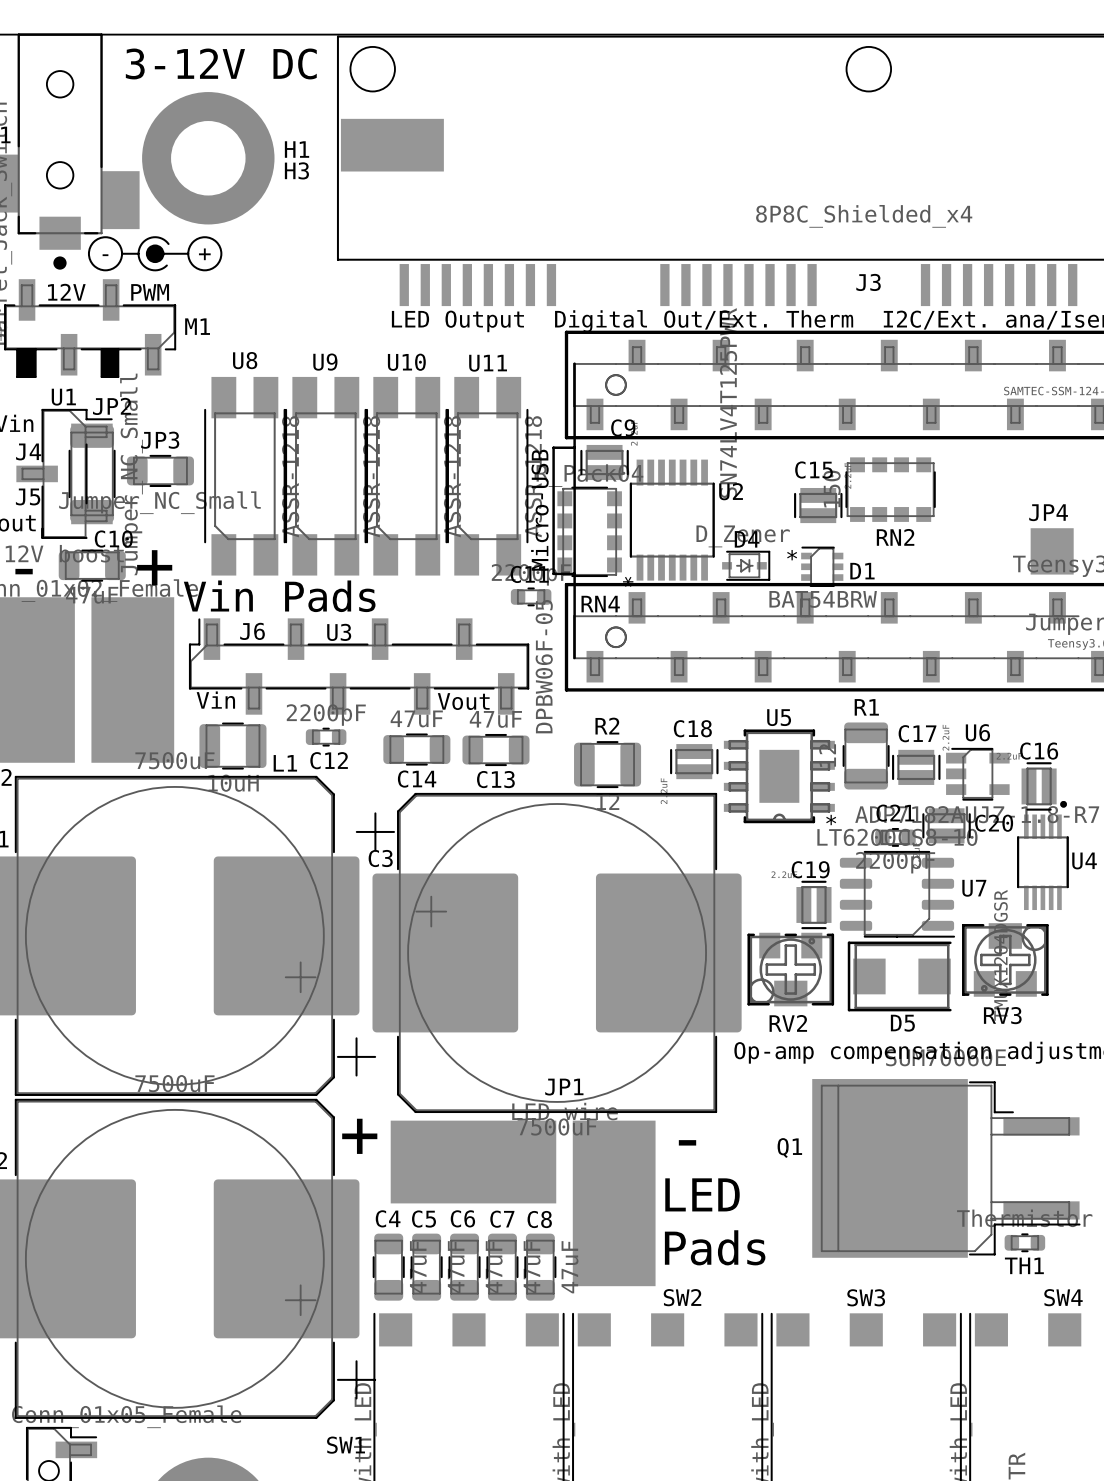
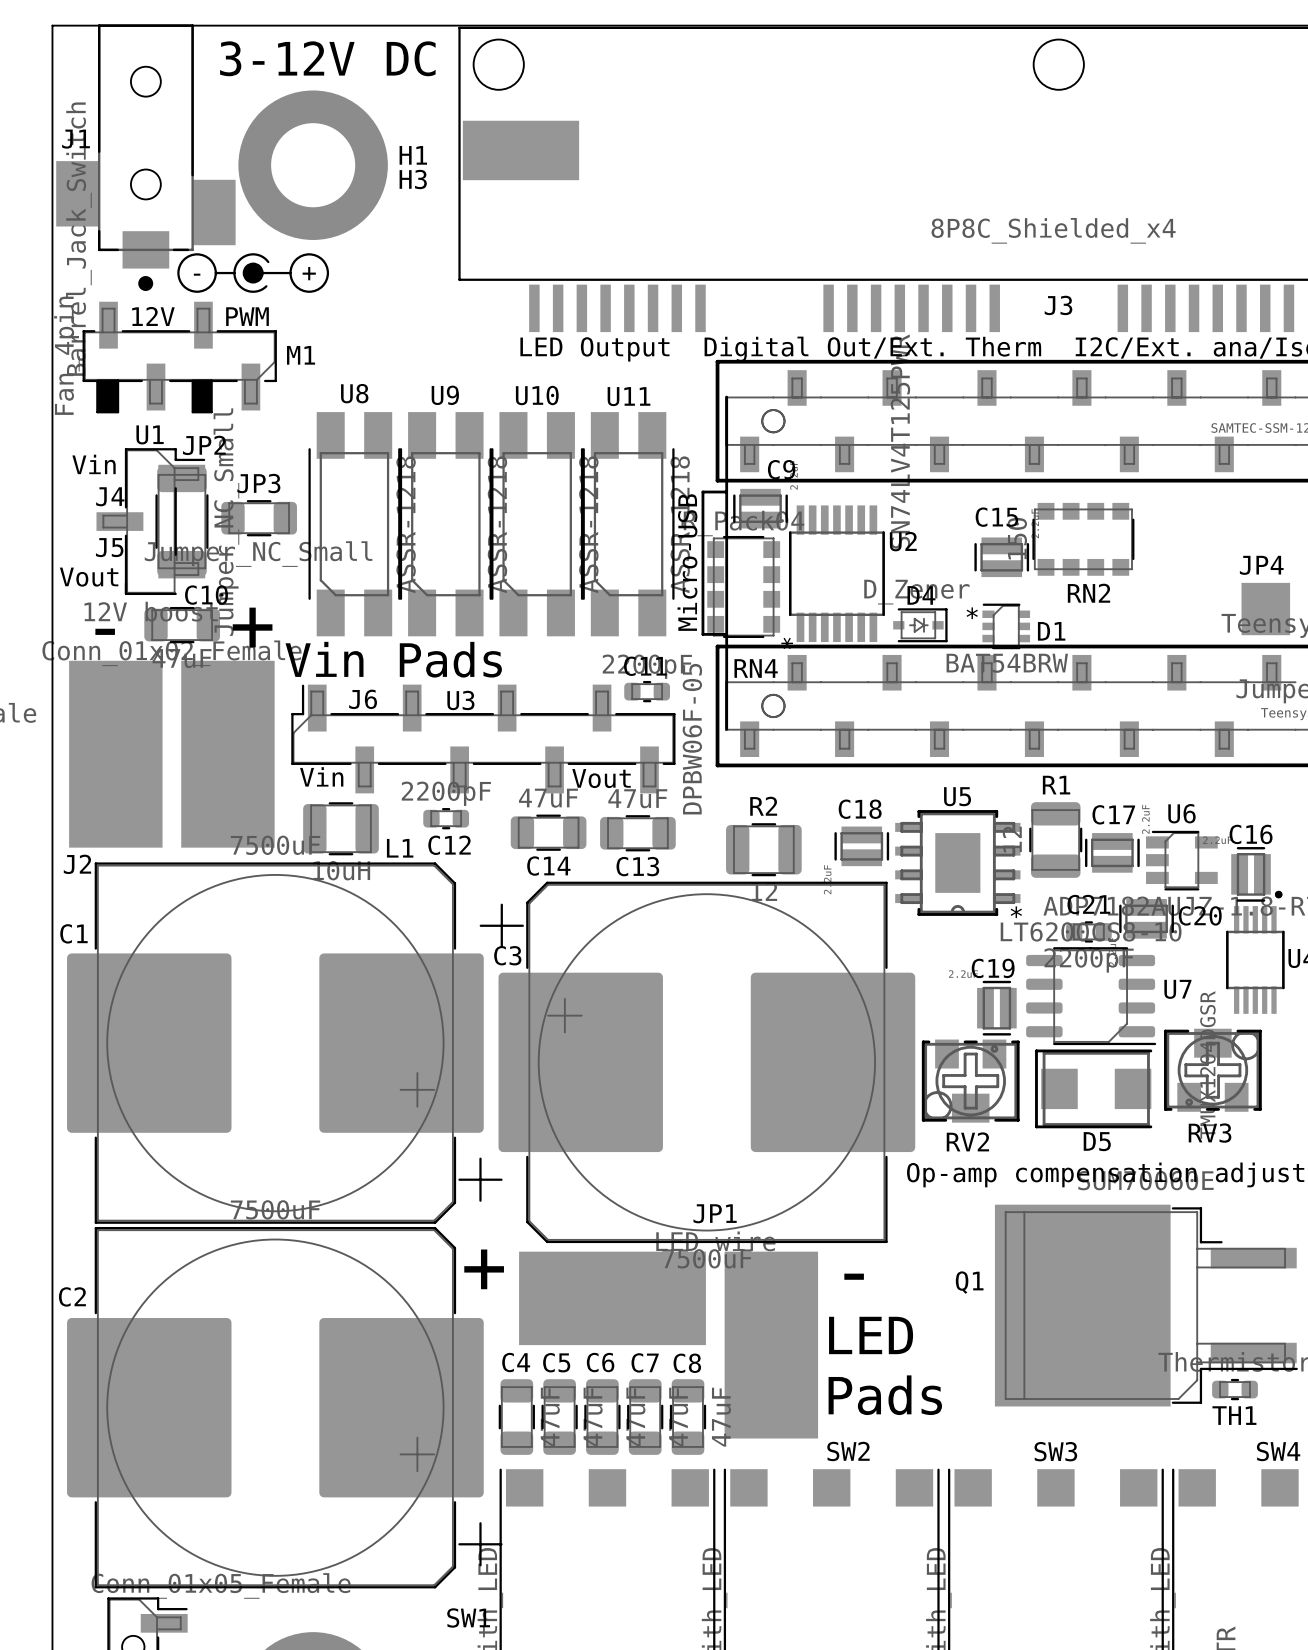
C11 position: (531, 596) -> (647, 691)

